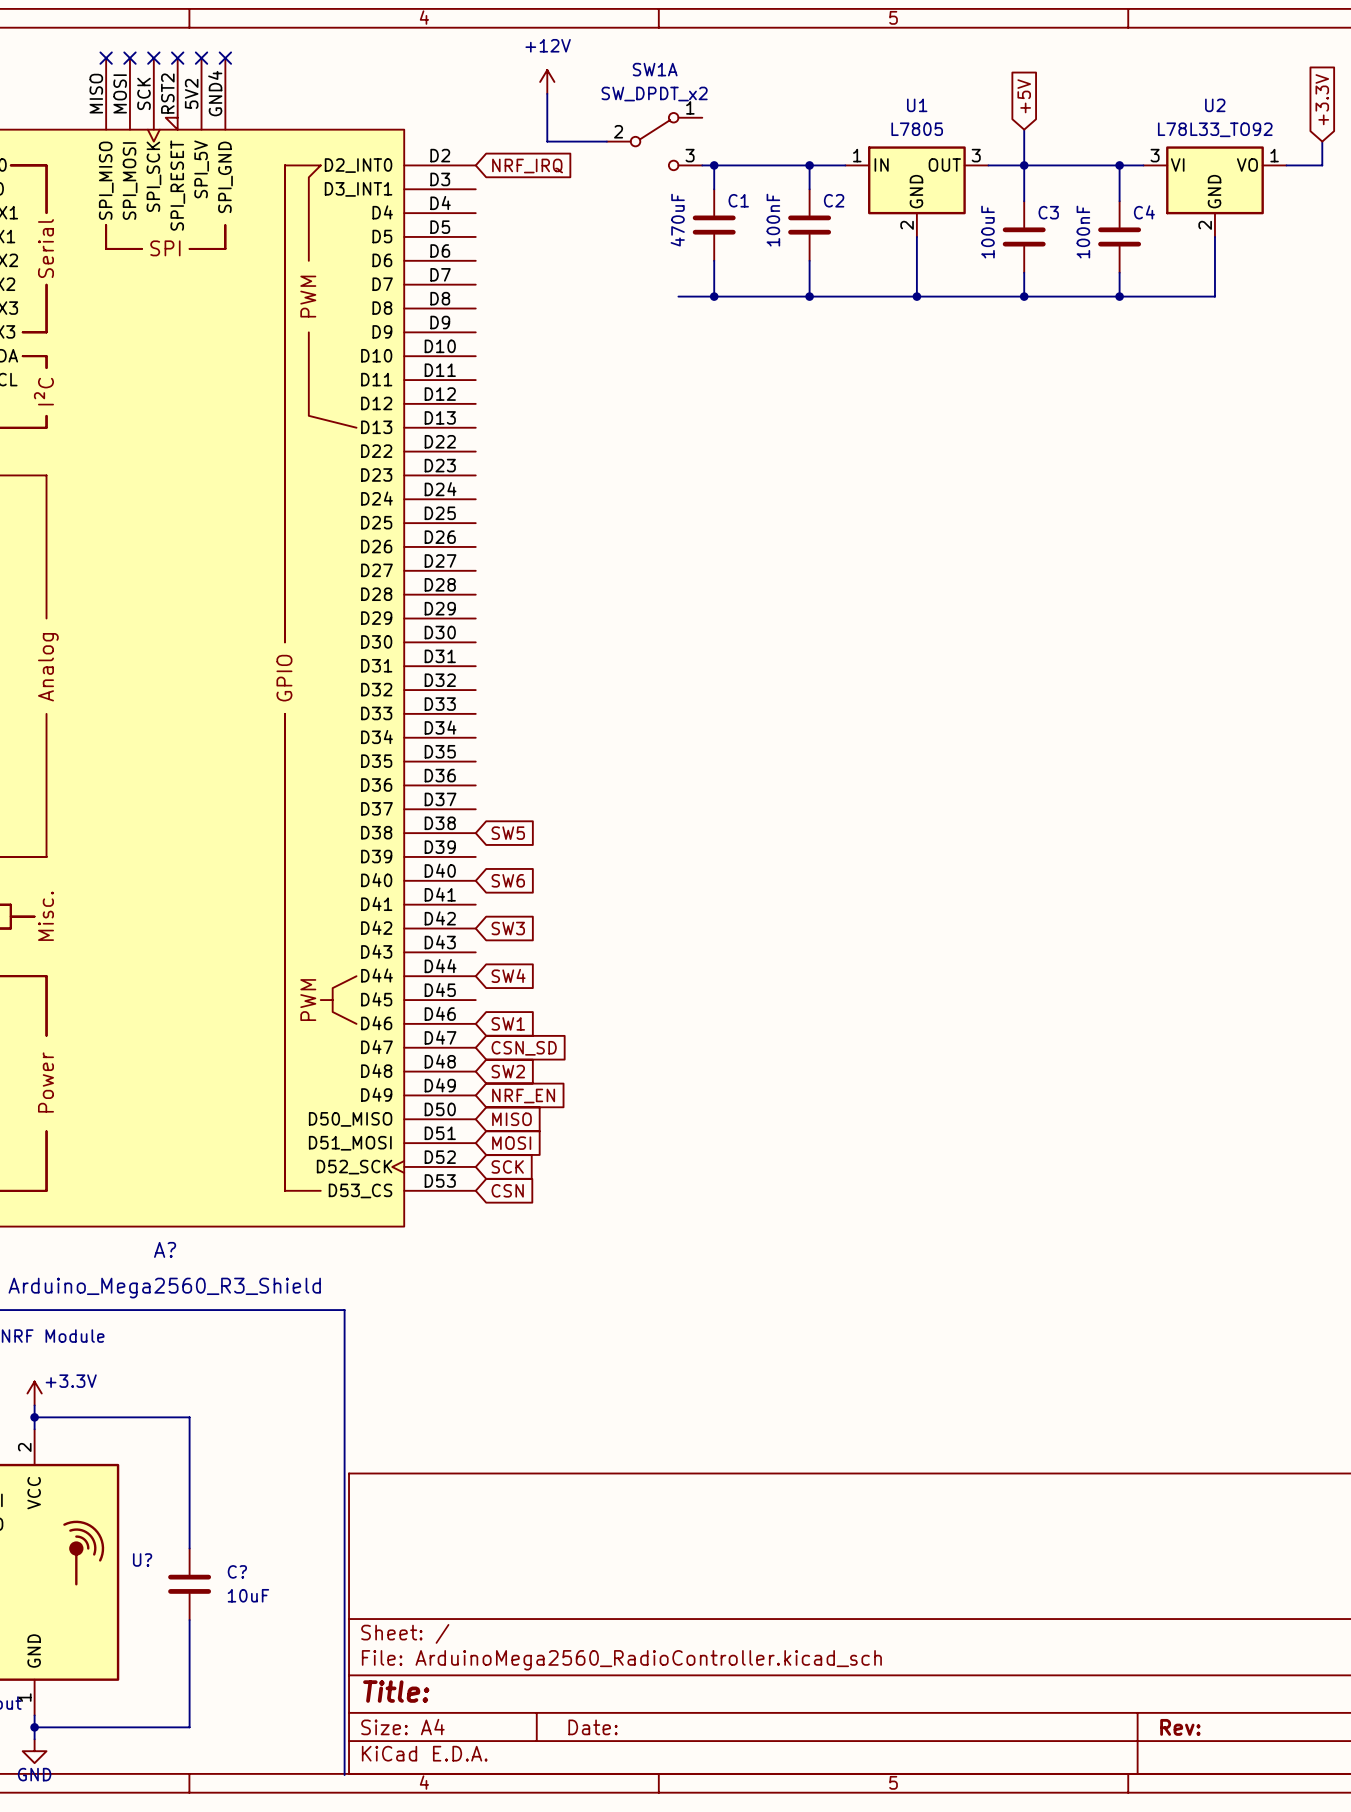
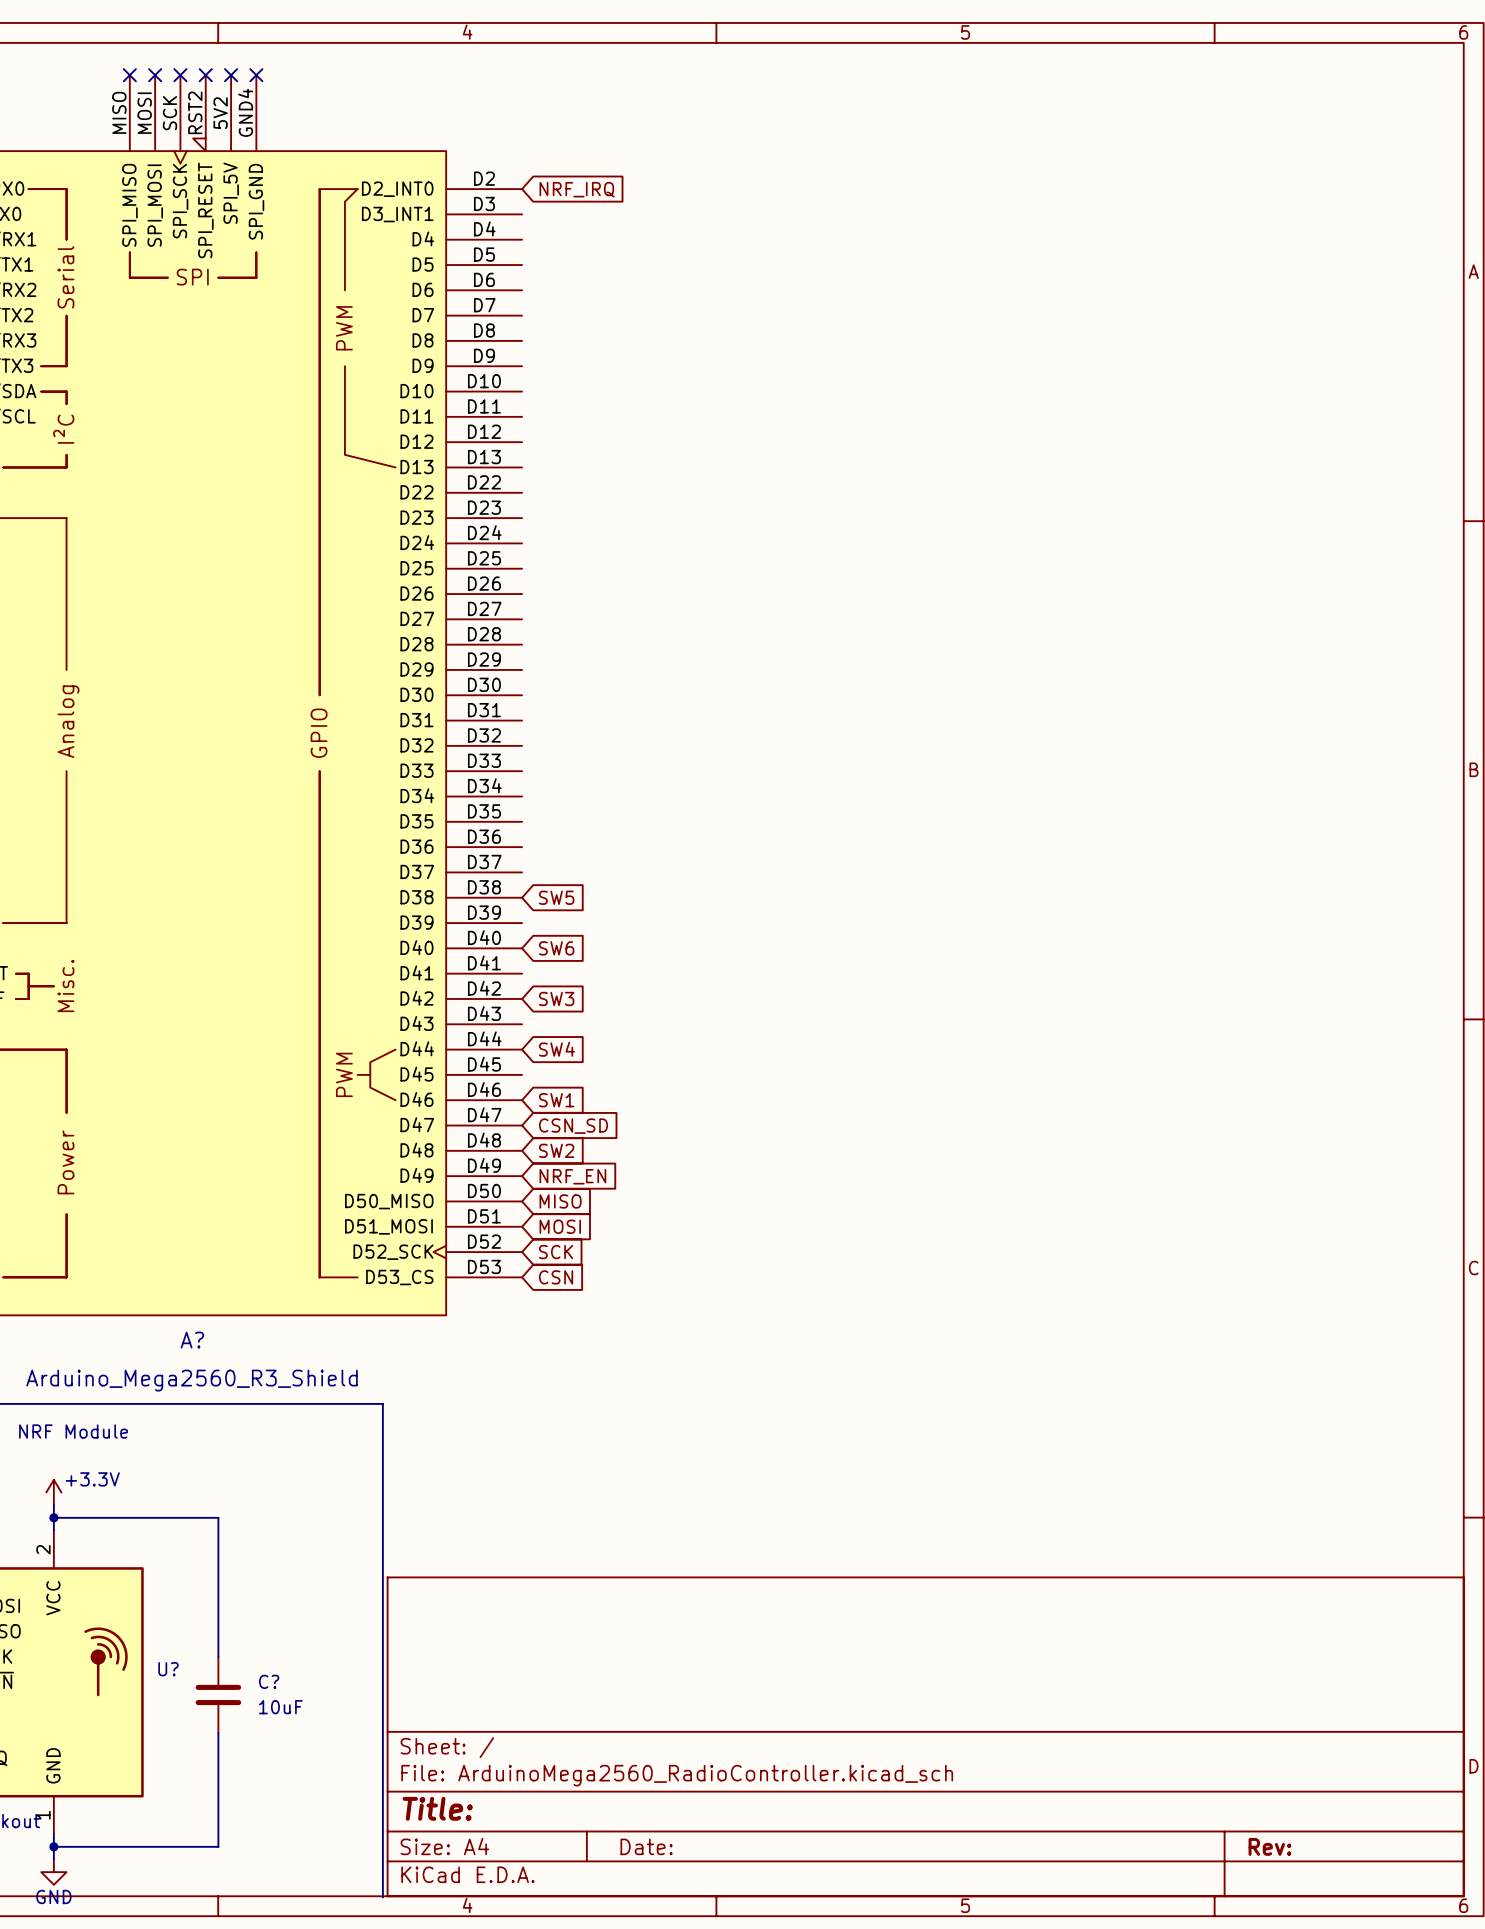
power symbol: +12V (547, 81) -> none
wire: (547, 93) (547, 141) (606, 141) -> none
global label: +5V (1024, 96) -> none
global label: +3.3V (1322, 99) -> none
wire: (1024, 129) (1024, 201) -> none
SW1A: SW_DPDT_x2 (654, 141) -> none
wire: (1322, 141) (1322, 165) (1286, 165) -> none
wire: (702, 165) (845, 165) -> none
wire: (714, 165) (714, 189) -> none
junction: (714, 165) -> none
wire: (809, 165) (809, 189) -> none
junction: (809, 165) -> none
wire: (988, 165) (1143, 165) -> none
junction: (1024, 165) -> none
wire: (1119, 165) (1119, 201) -> none
junction: (1119, 165) -> none
U1: L7805 (916, 191) -> none
U2: L78L33_TO92 (1214, 191) -> none
C1: 470uF (714, 225) -> none
C2: 100nF (809, 225) -> none
wire: (916, 236) (916, 296) -> none
C3: 100uF (1024, 236) -> none
C4: 100nF (1119, 236) -> none
wire: (1214, 236) (1214, 296) (678, 296) -> none
wire: (714, 260) (714, 296) -> none
wire: (809, 260) (809, 296) -> none
wire: (1024, 272) (1024, 296) -> none
wire: (1119, 272) (1119, 296) -> none
junction: (714, 296) -> none
junction: (809, 296) -> none
junction: (916, 296) -> none
junction: (1024, 296) -> none
junction: (1119, 296) -> none

